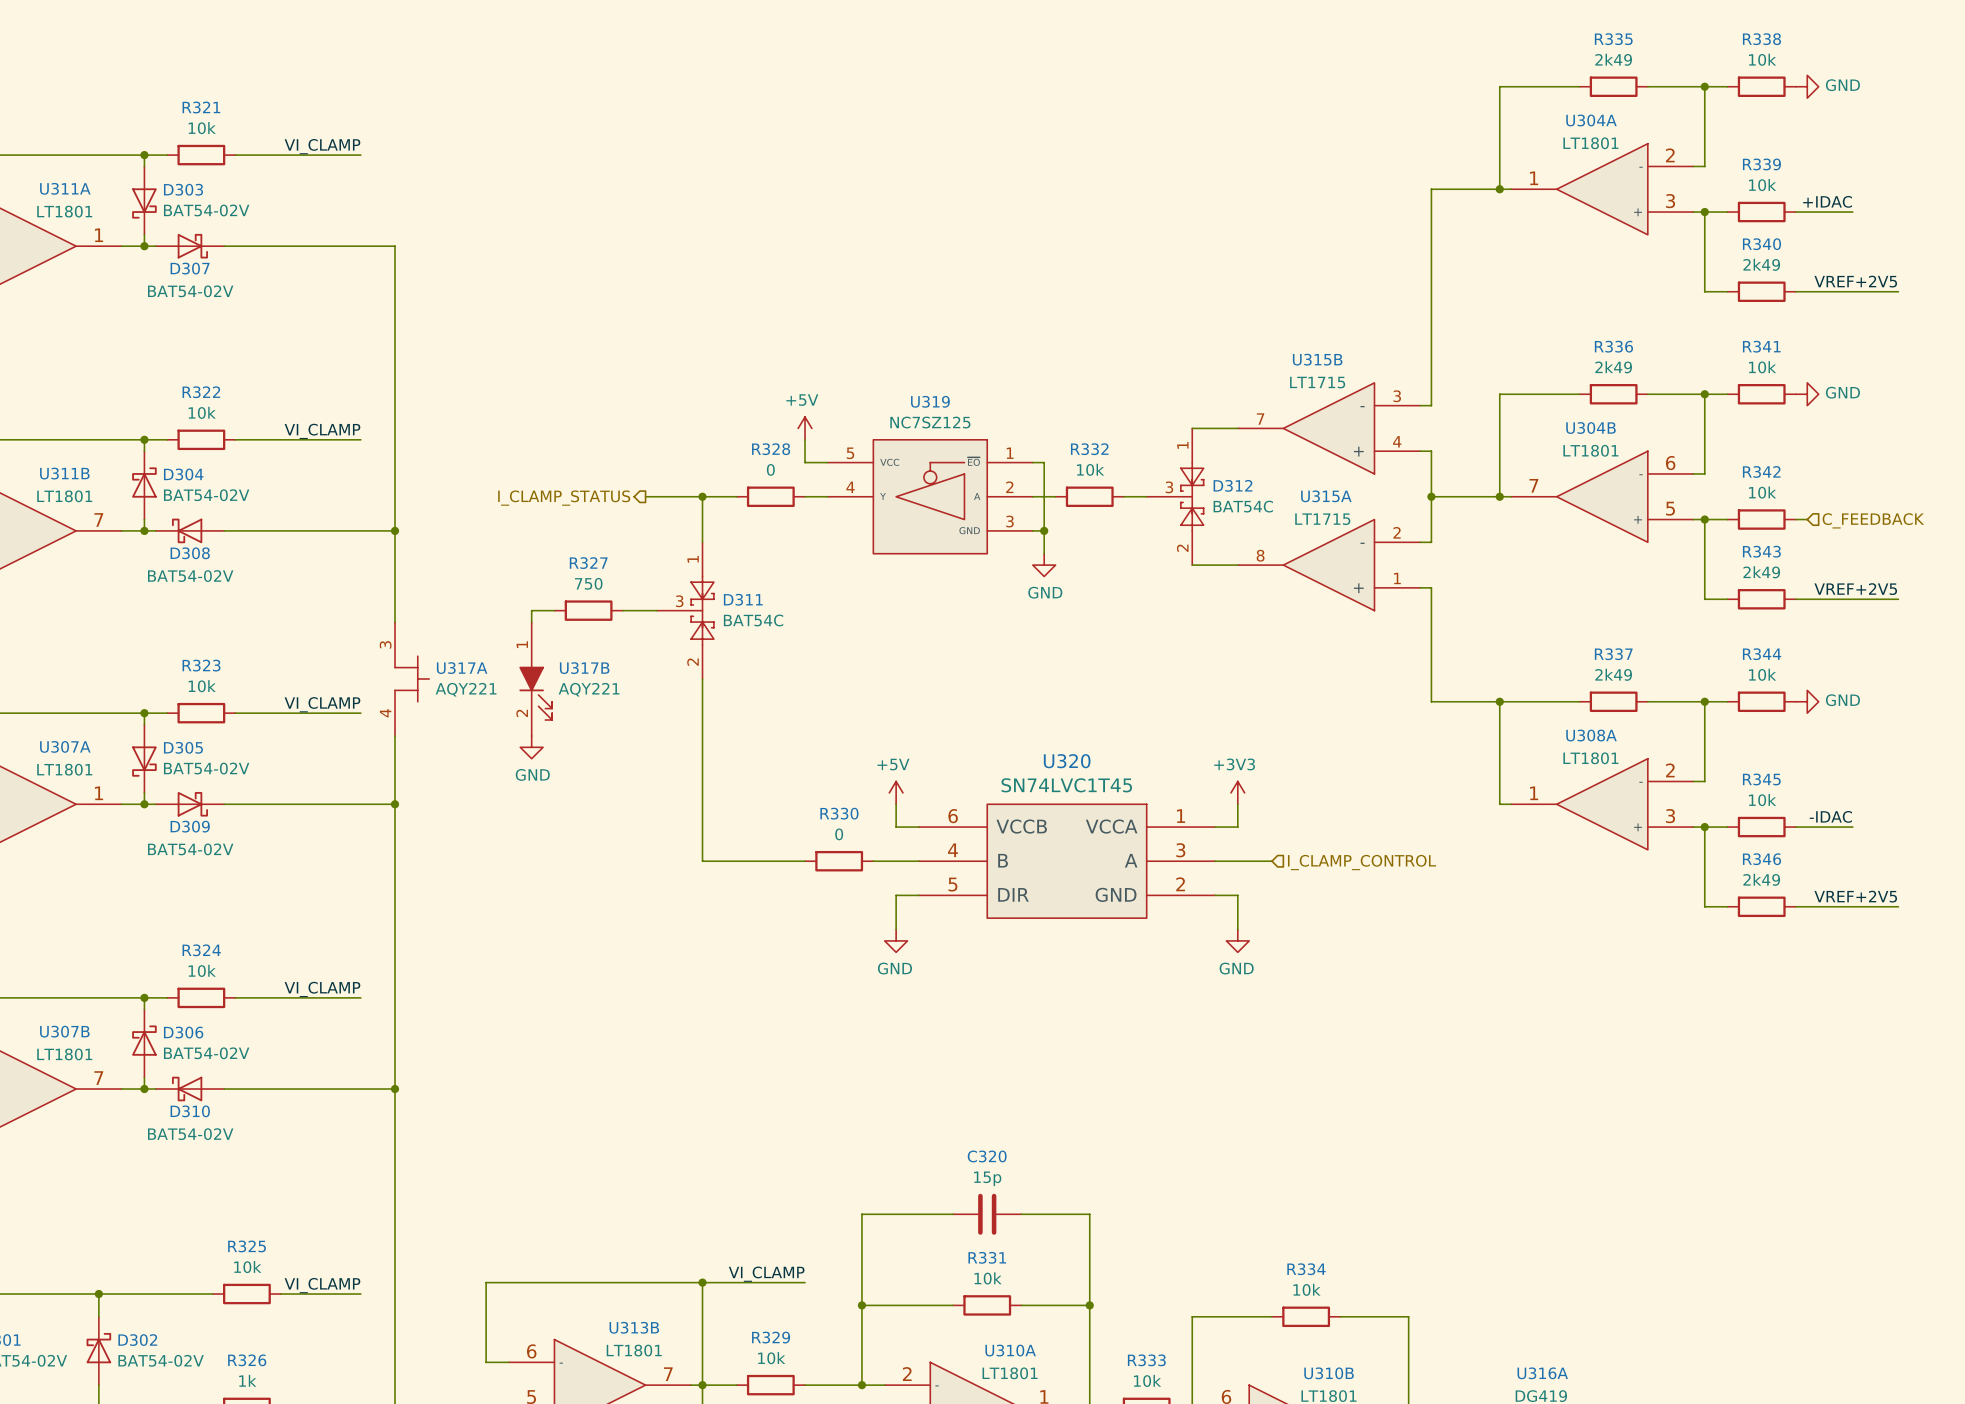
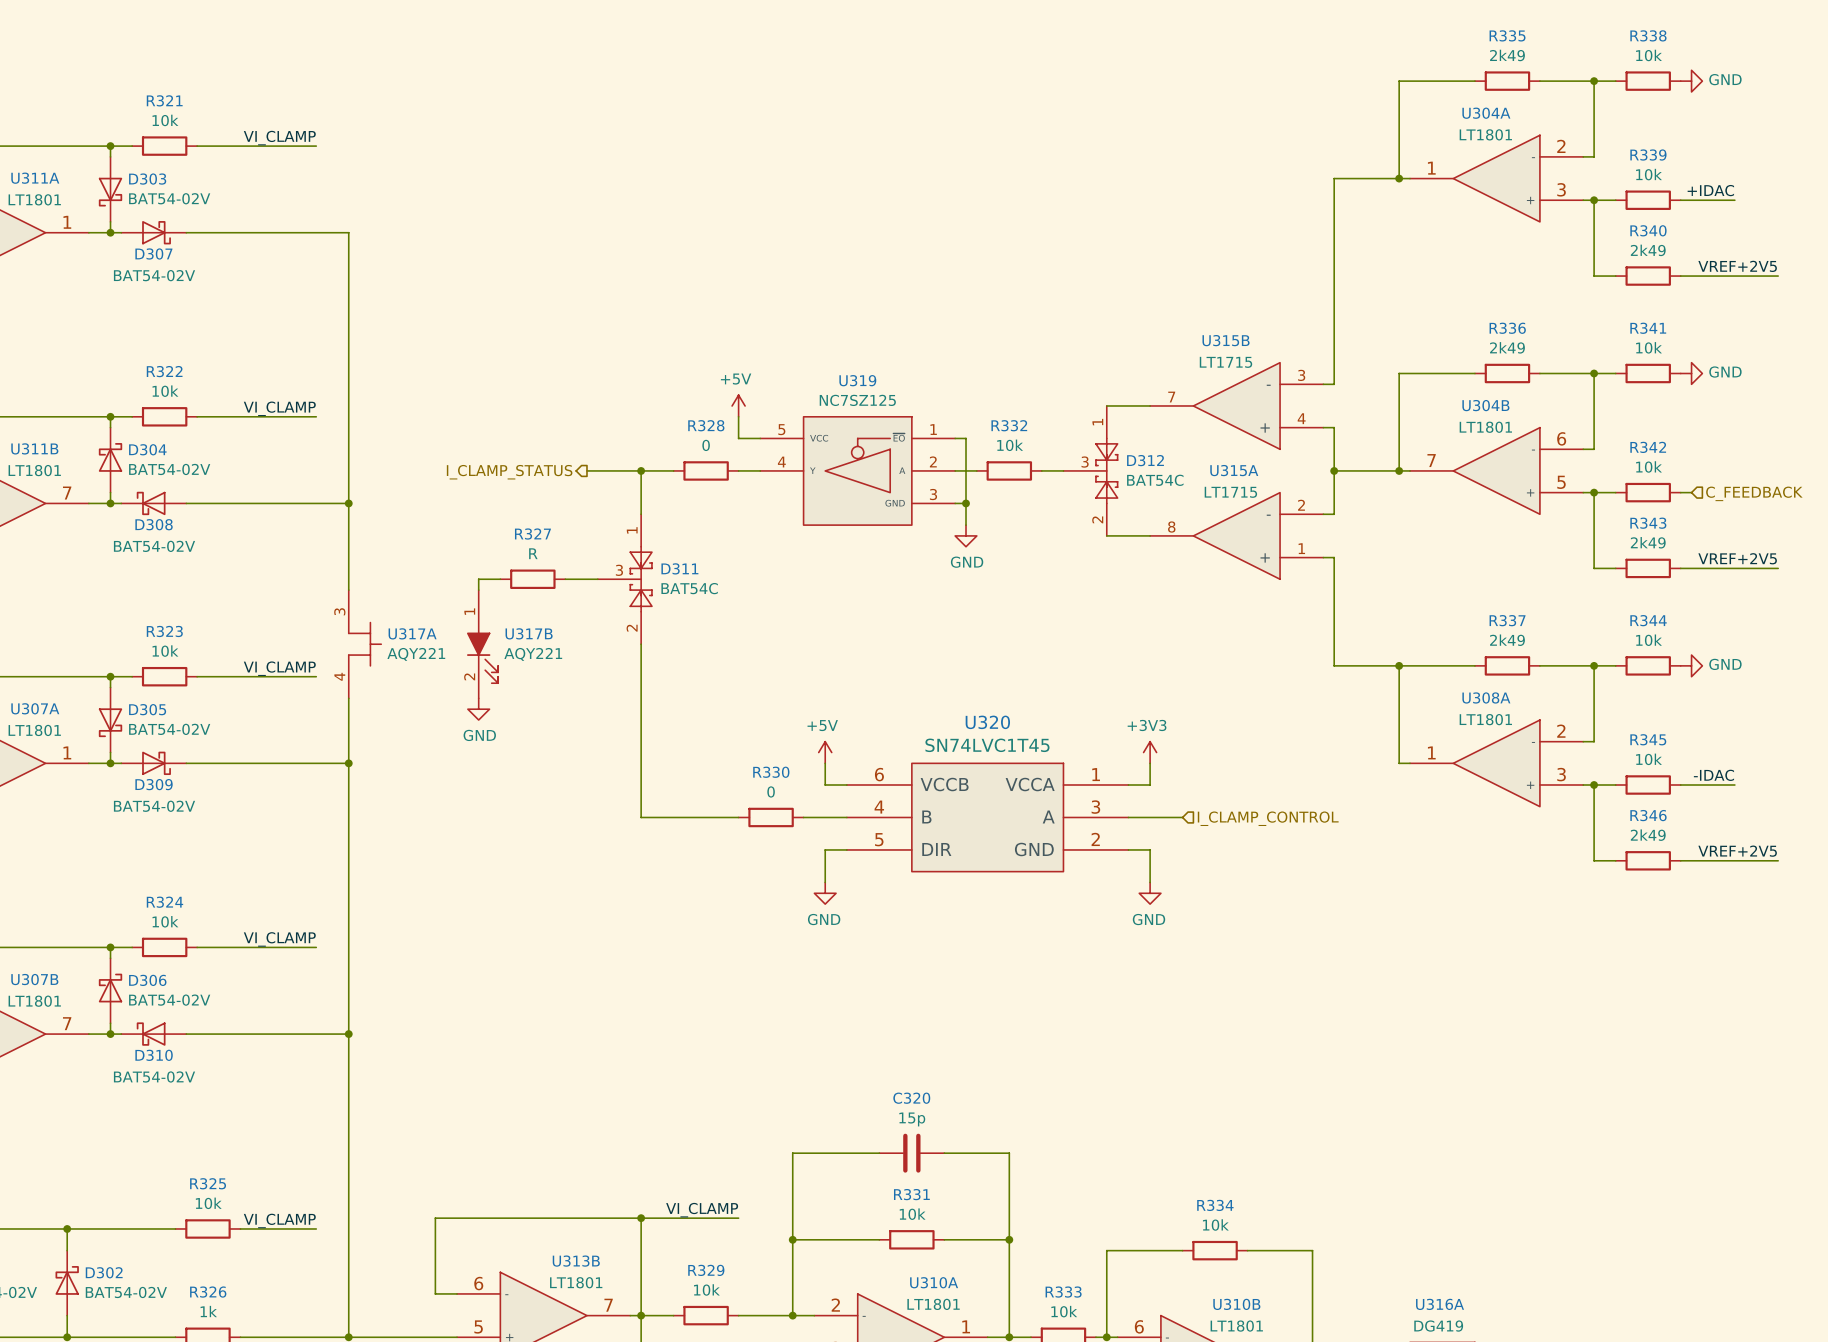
R327 value: 750 (588, 583) -> R (533, 553)

